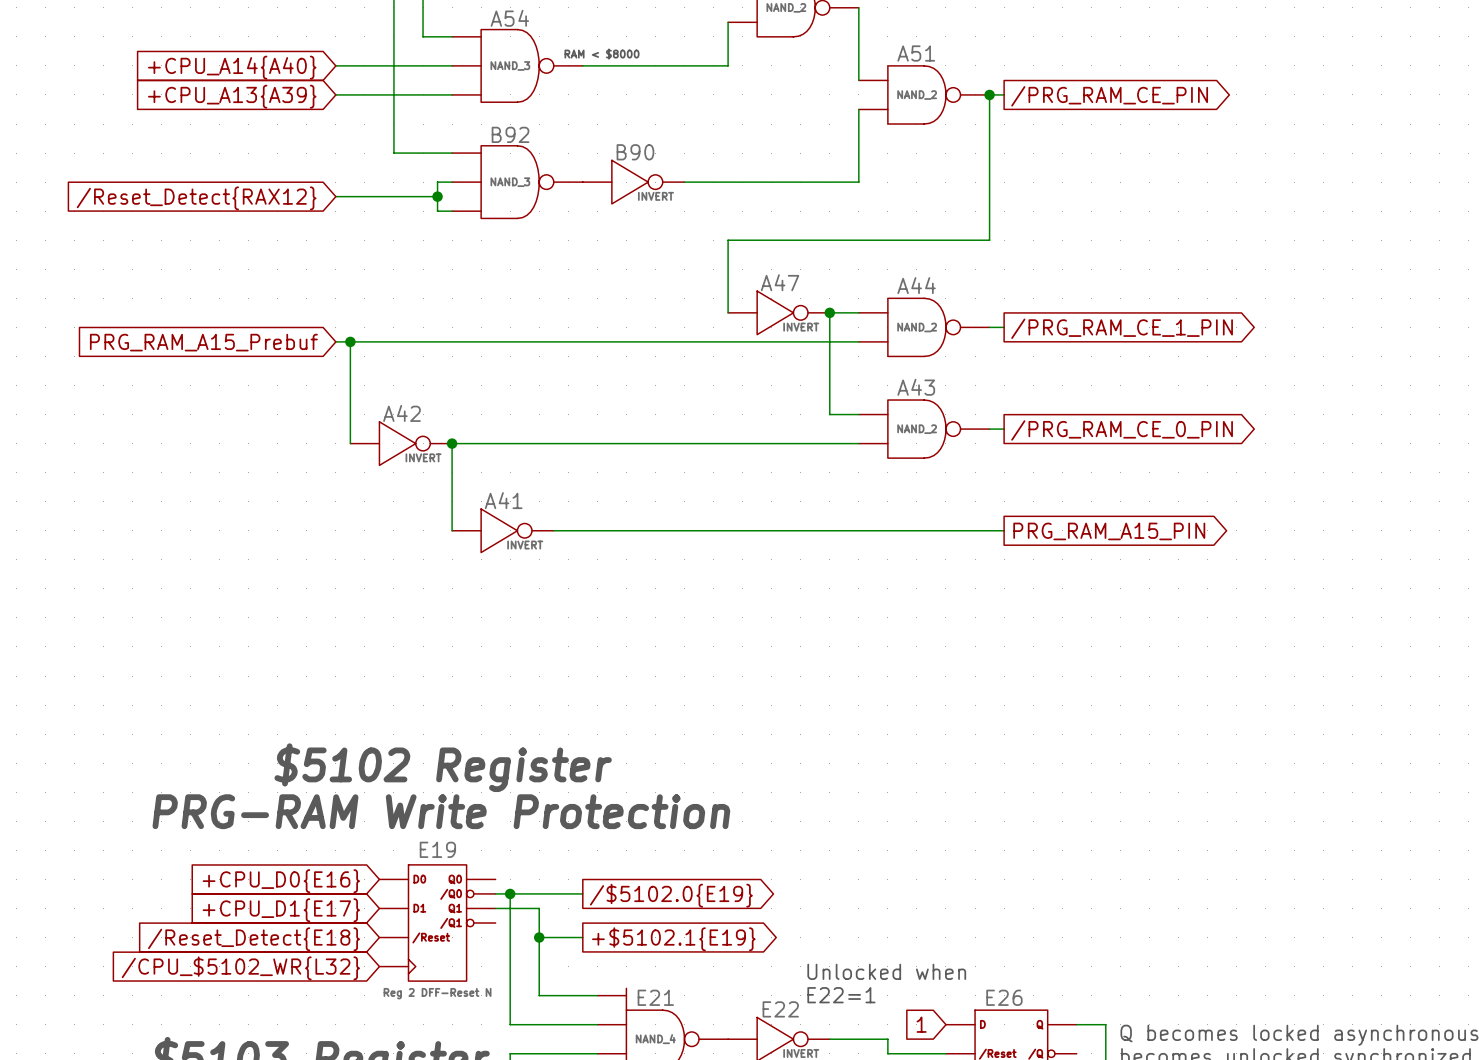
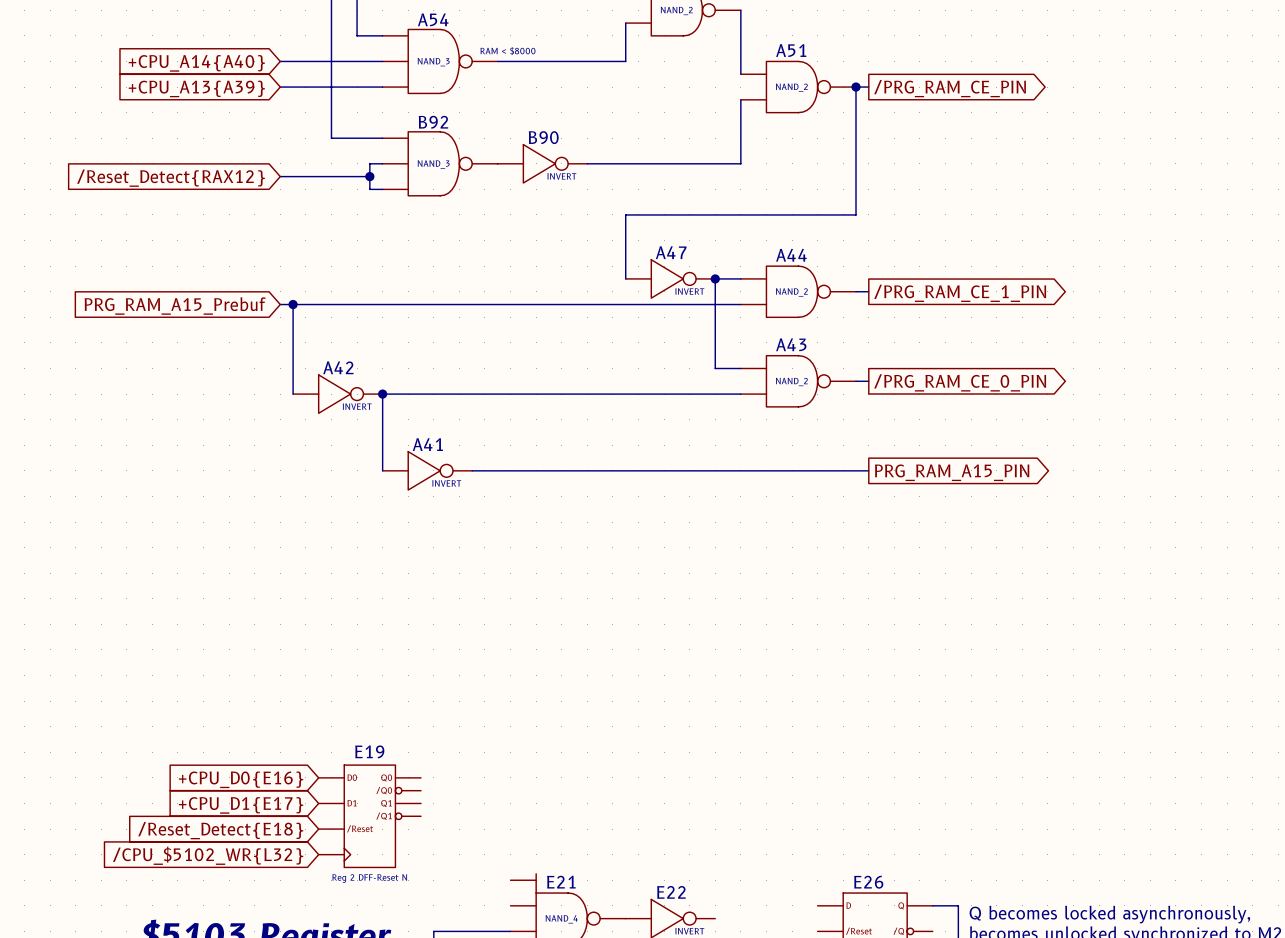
text: $5102 Register (443, 767) -> none
text: PRG-RAM Write Protection (441, 811) -> none
wire: (495, 893) (582, 893) -> none
wire: (510, 893) (510, 1024) (597, 1024) -> none
junction: (510, 893) -> none
global label: /$5102.0{E19} (671, 895) -> none
wire: (495, 908) (539, 908) (539, 995) (597, 995) -> none
wire: (539, 937) (582, 937) -> none
junction: (539, 937) -> none
global label: +$5102.1{E19} (673, 939) -> none
text: Unlocked when (886, 971) -> none
text: E22=1 (841, 995) -> none
global label: 1 (921, 1024) -> none
wire: (829, 1039) (887, 1039) (887, 1053) (945, 1053) -> none

